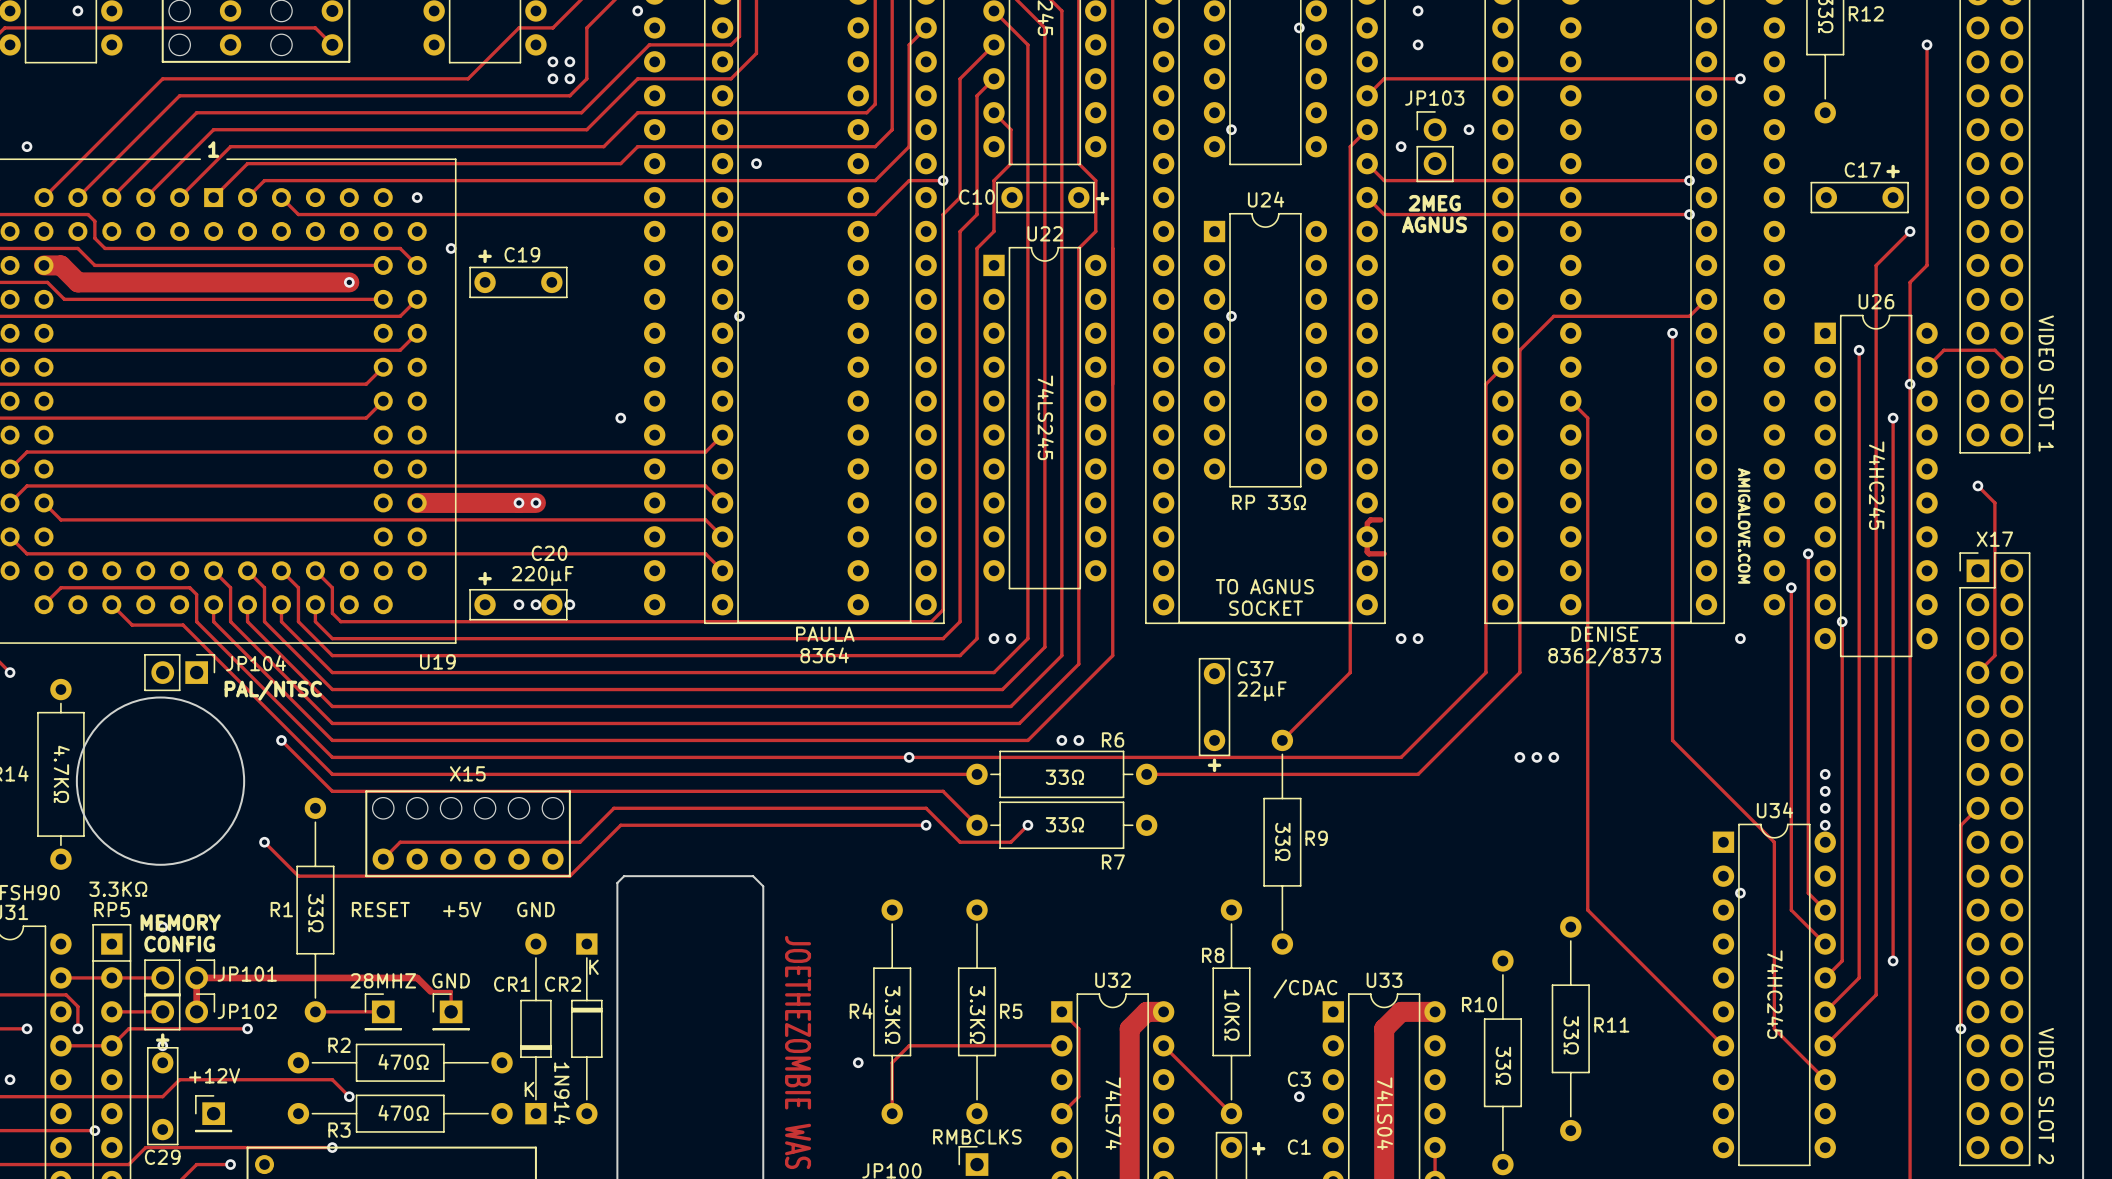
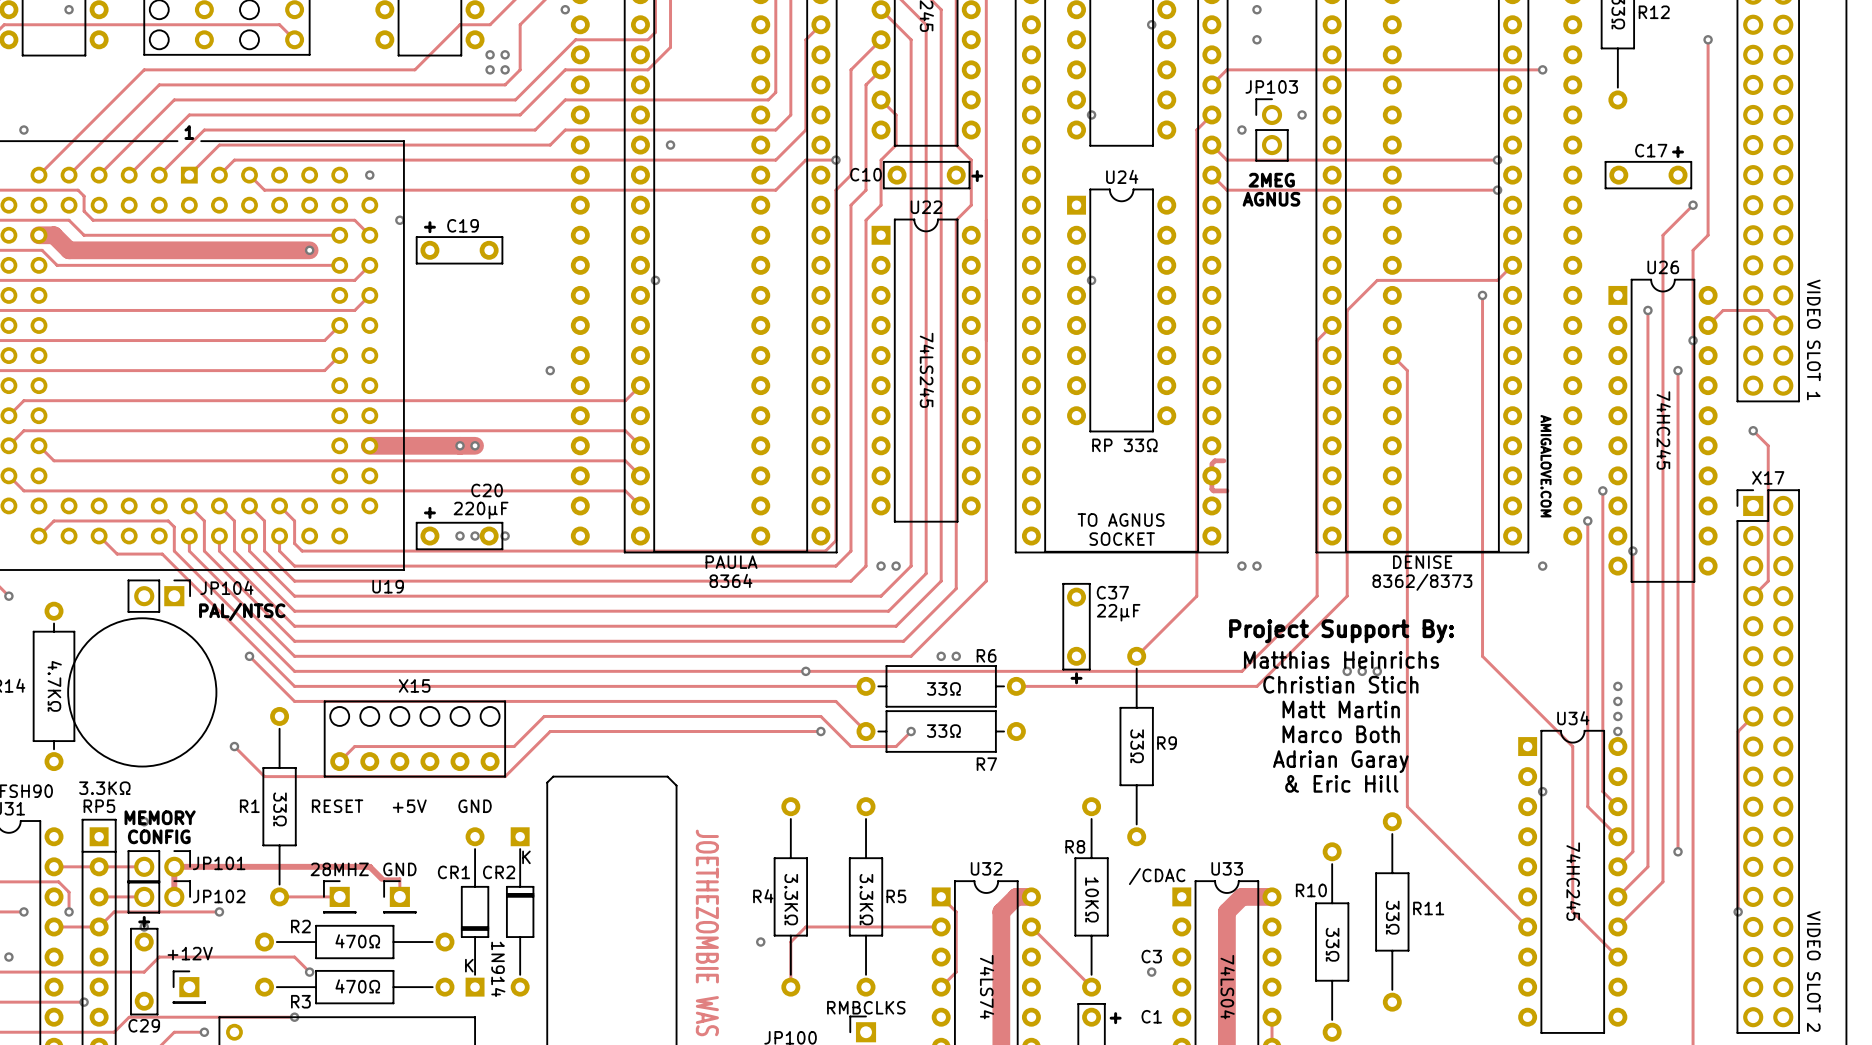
text: none -> Project Support By: (1341, 631)
text: none -> Matthias Heinrichs (1341, 659)
text: none -> Christian Stich (1340, 684)
text: none -> Matt Martin (1341, 709)
text: none -> Marco Both (1341, 734)
text: none -> Adrian Garay (1340, 761)
text: none -> & Eric Hill (1341, 783)

